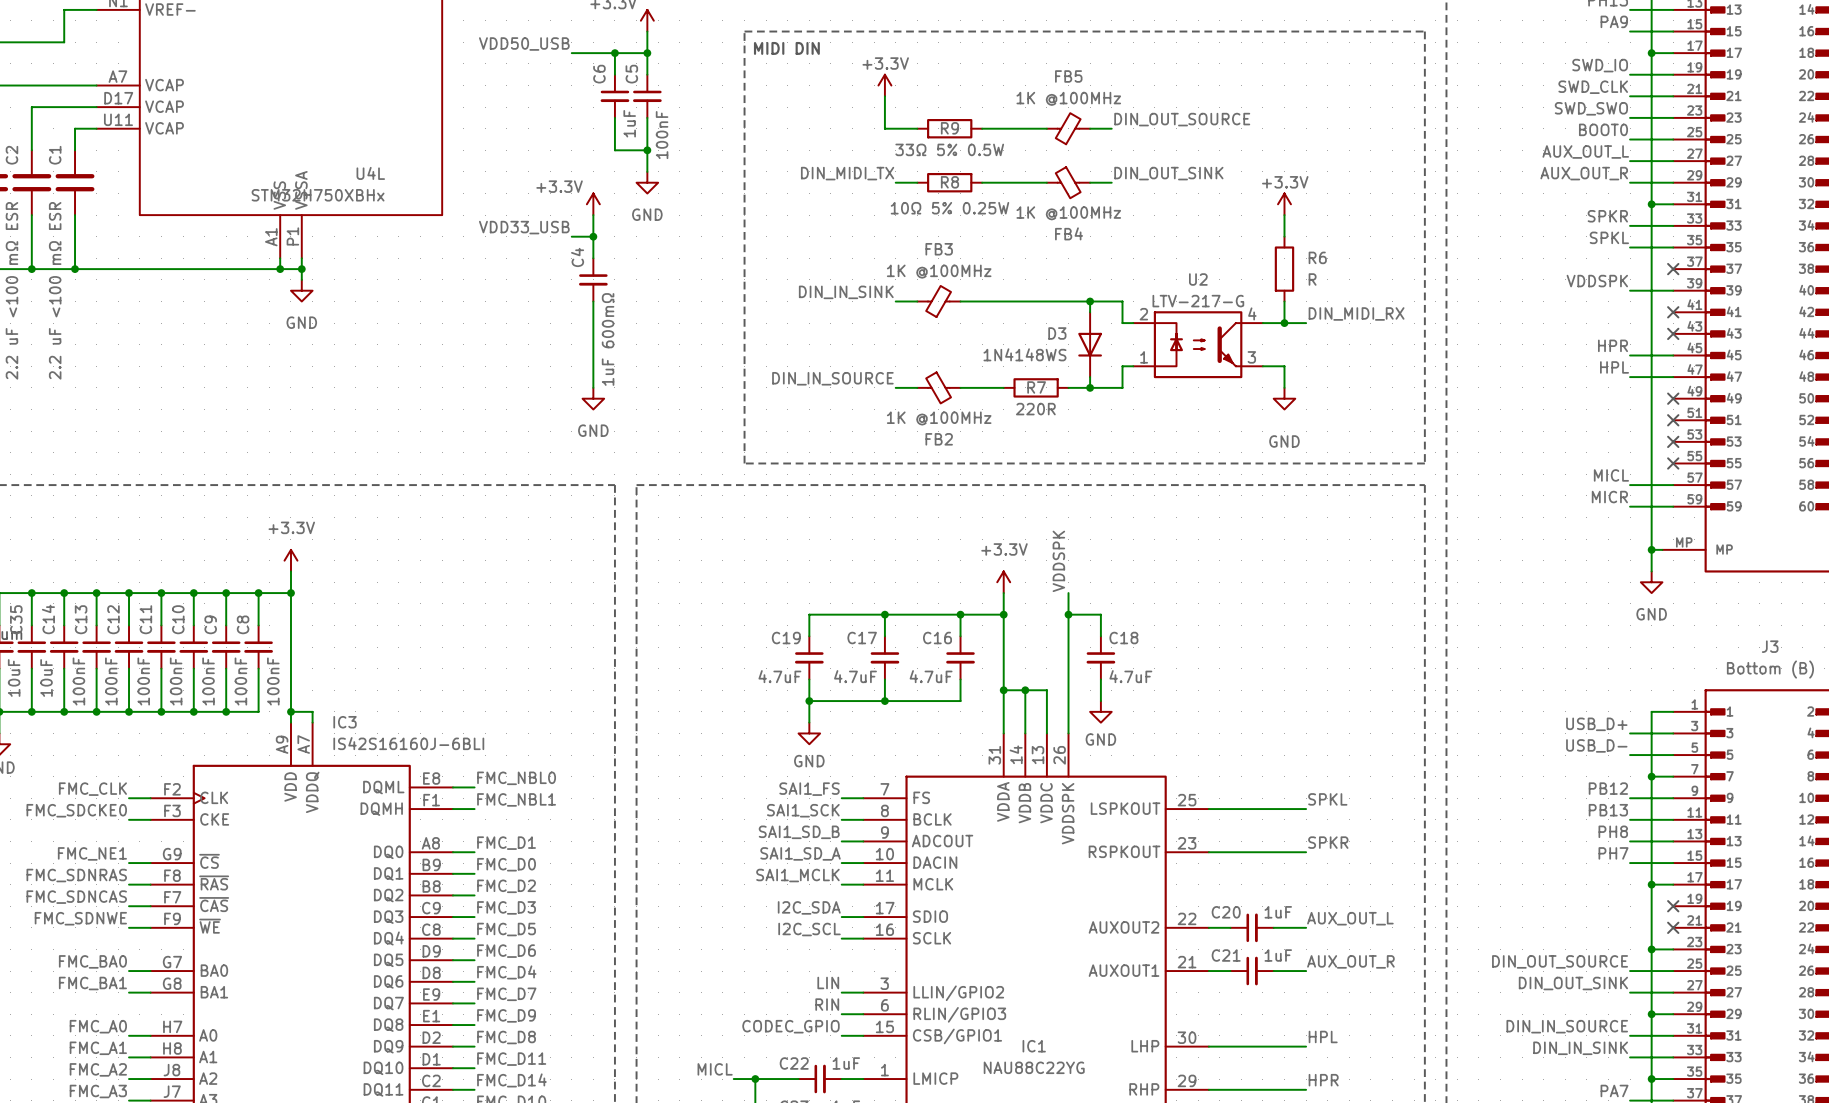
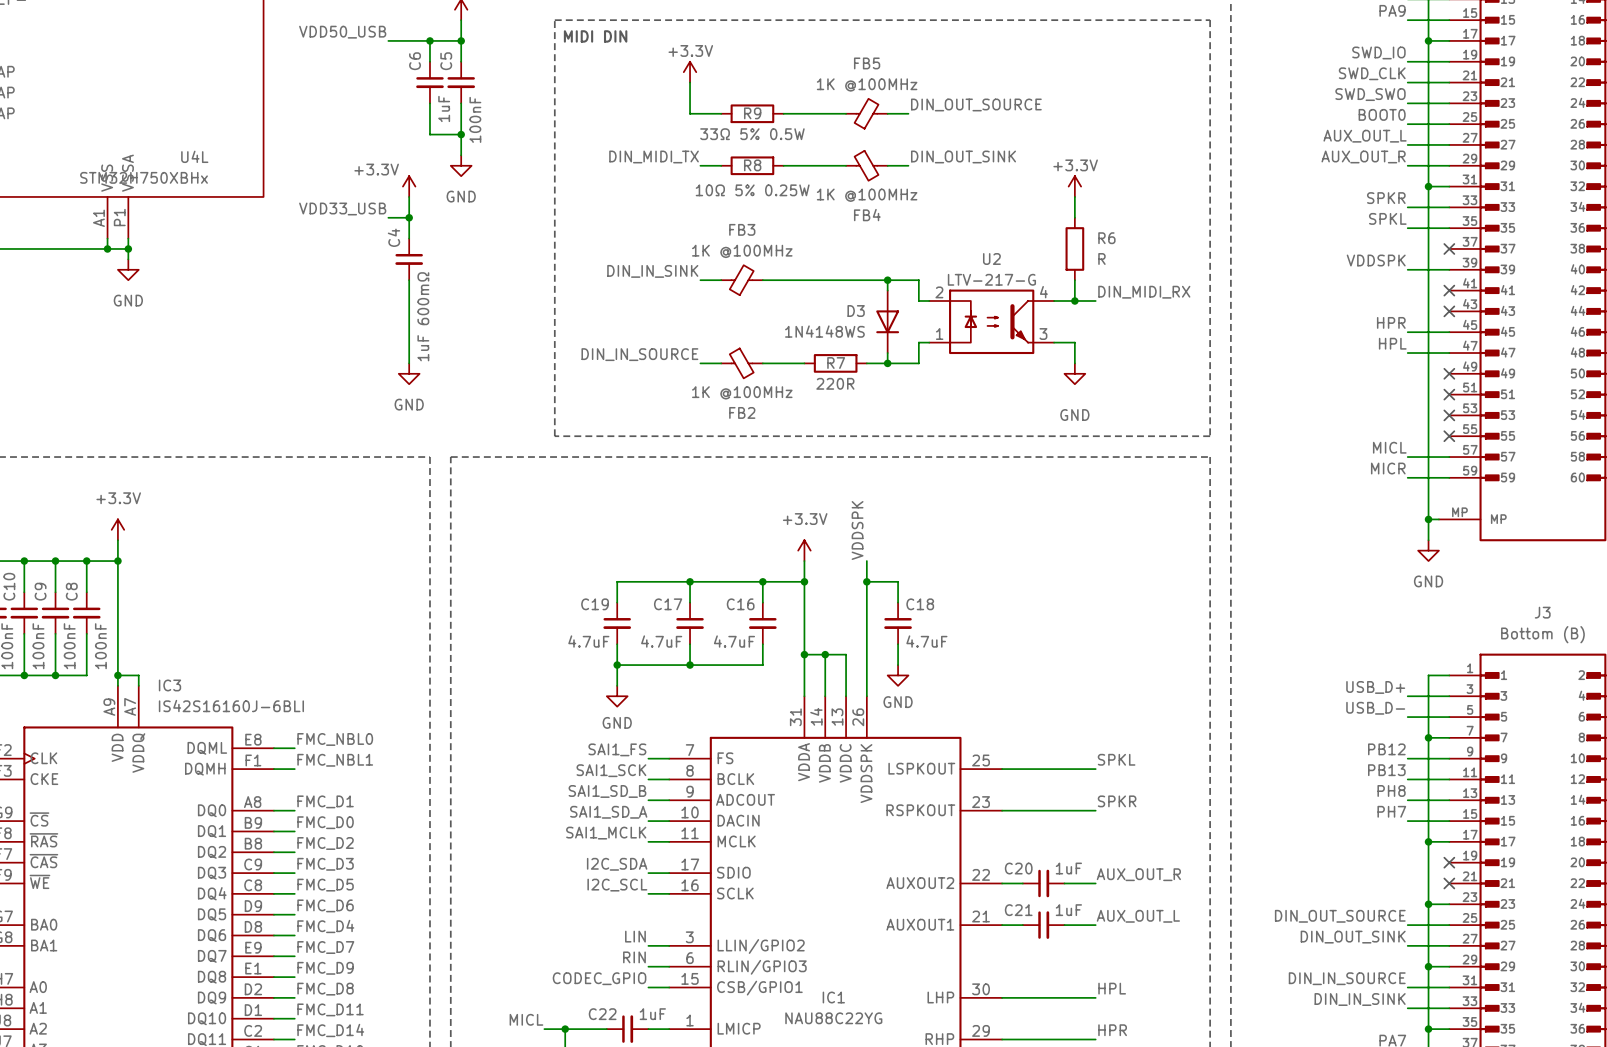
label: AUX_OUT_L (1350, 918) -> AUX_OUT_R (1138, 874)
label: AUX_OUT_R (1350, 961) -> AUX_OUT_L (1138, 916)

